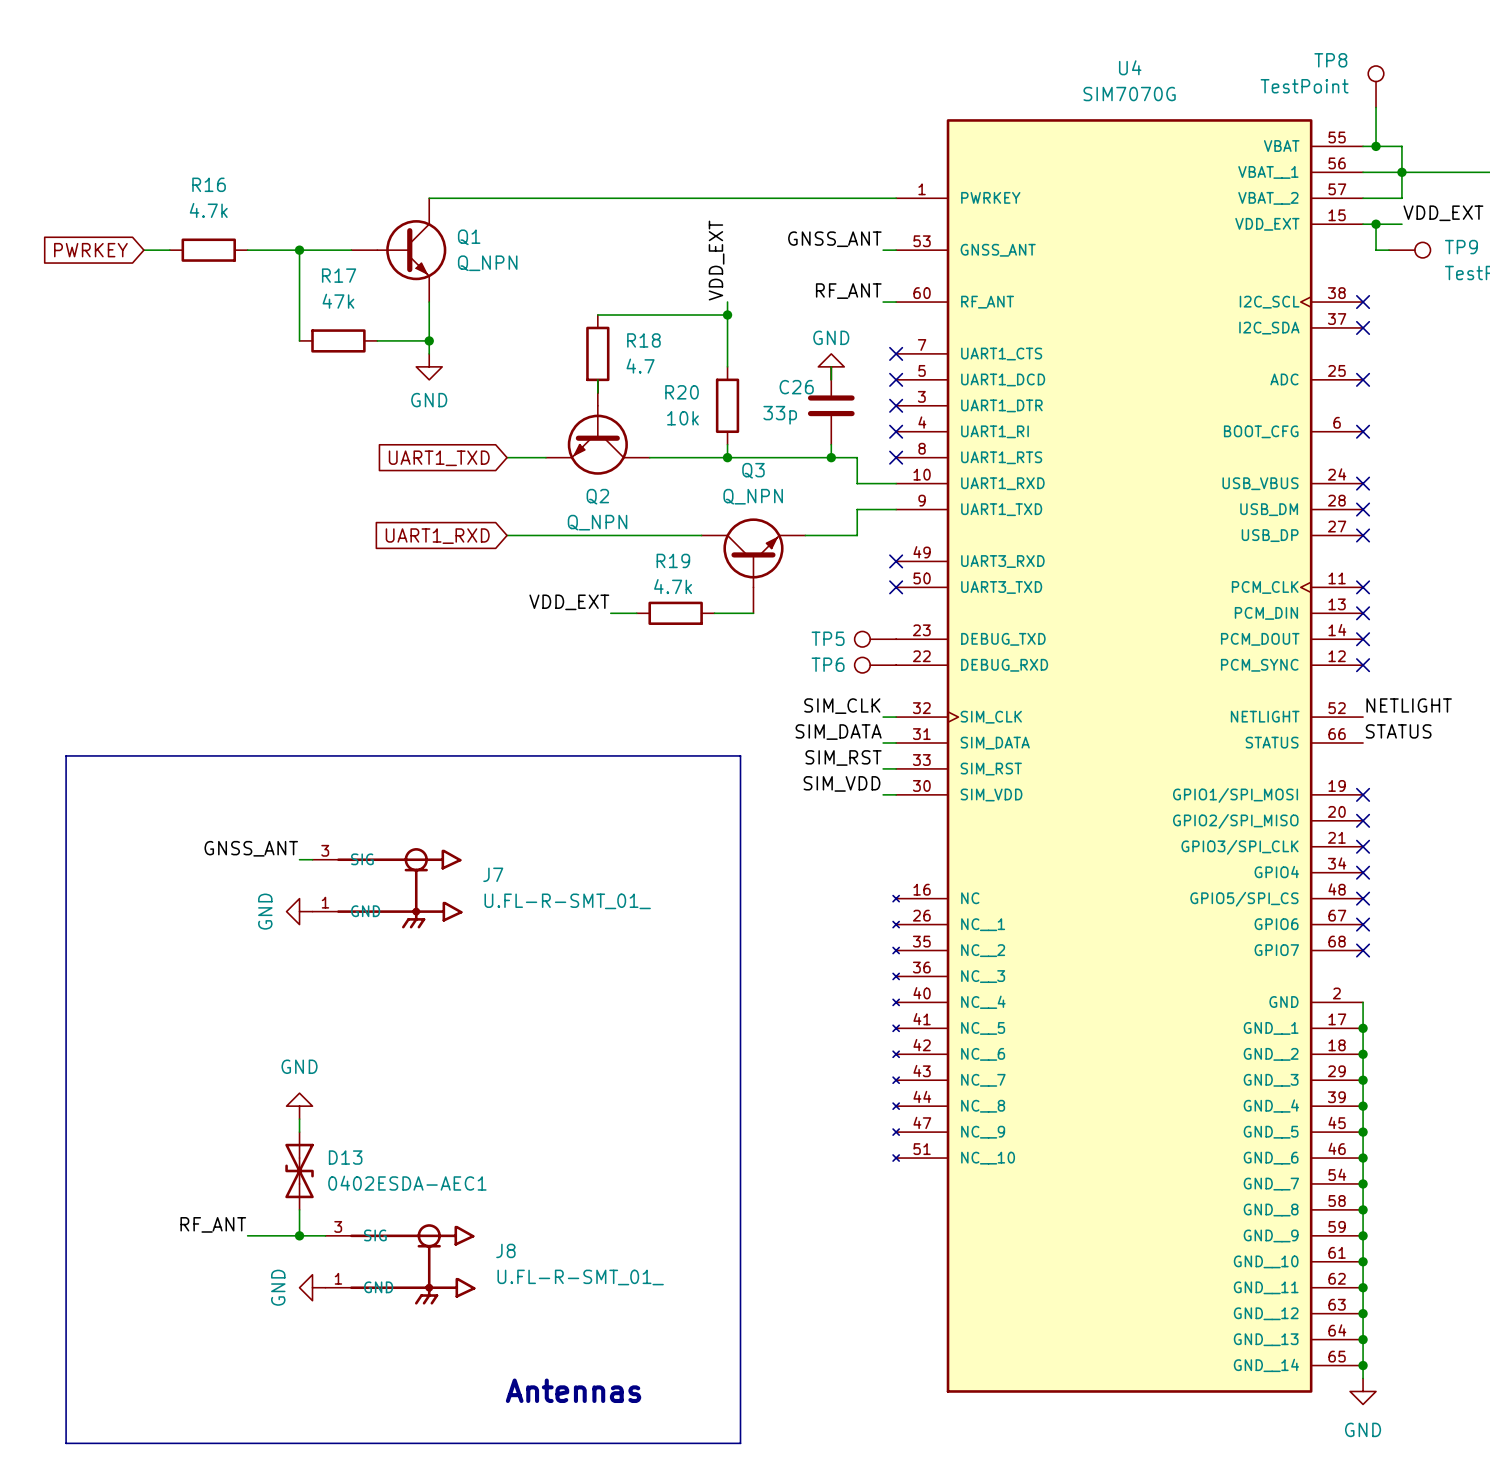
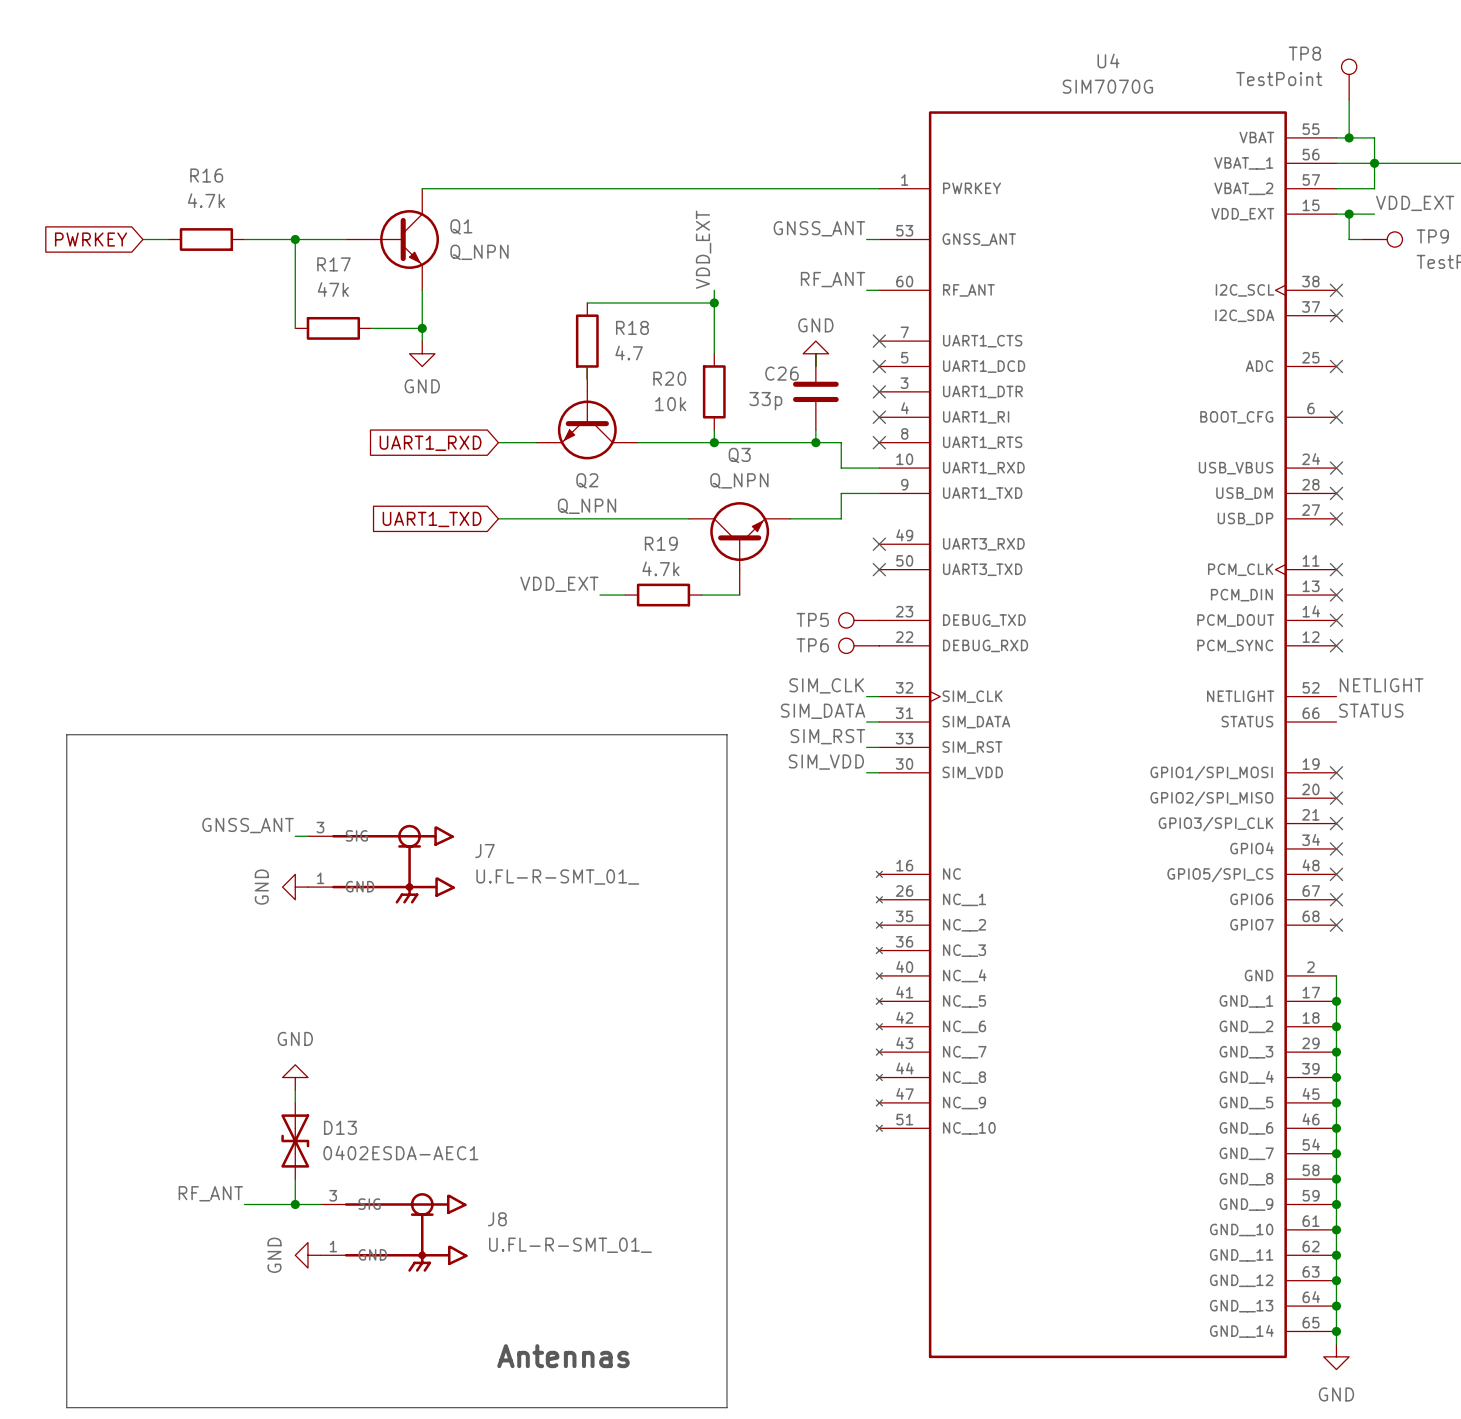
global label: UART1_TXD (439, 458) -> UART1_RXD (430, 443)
global label: UART1_RXD (437, 536) -> UART1_TXD (432, 519)

